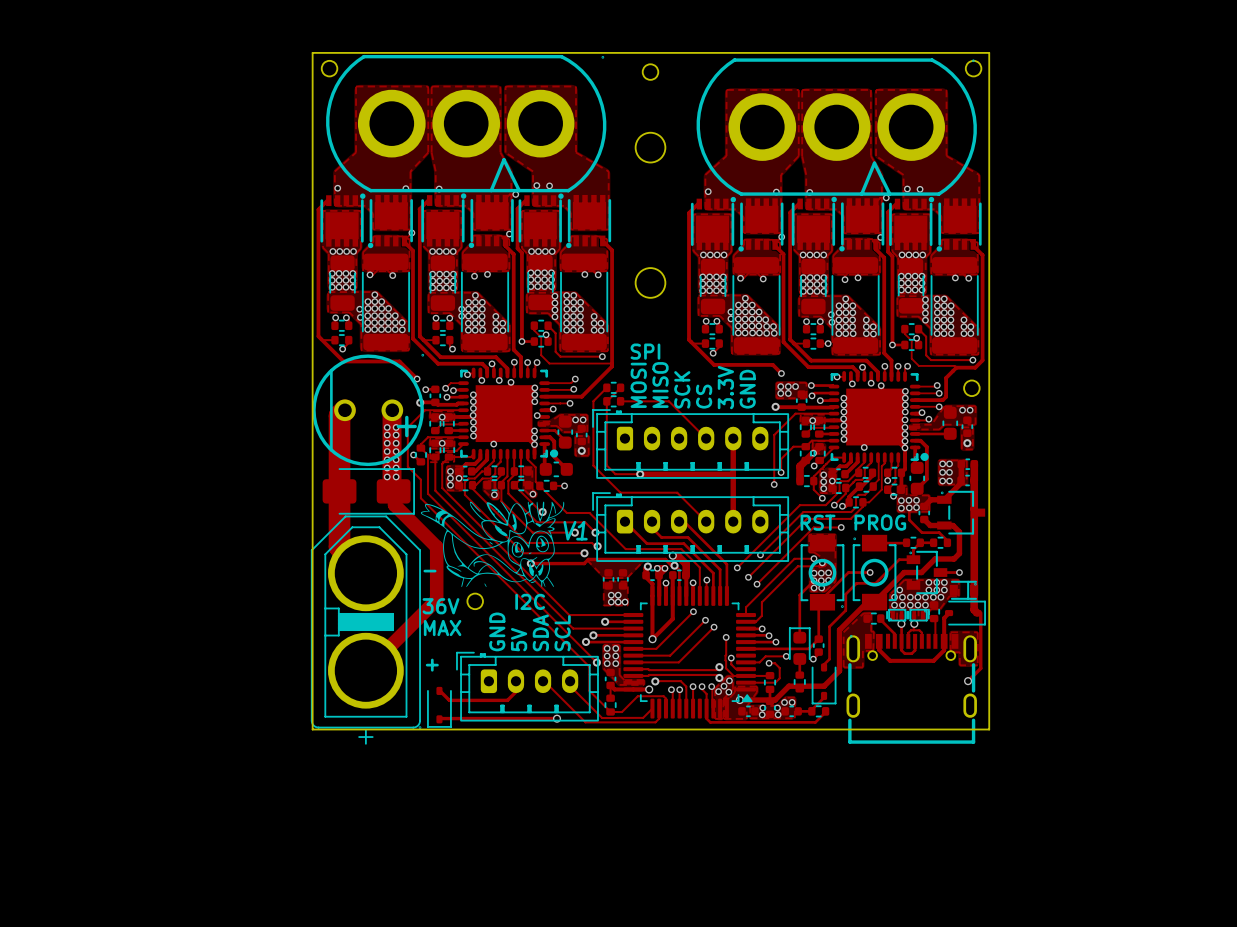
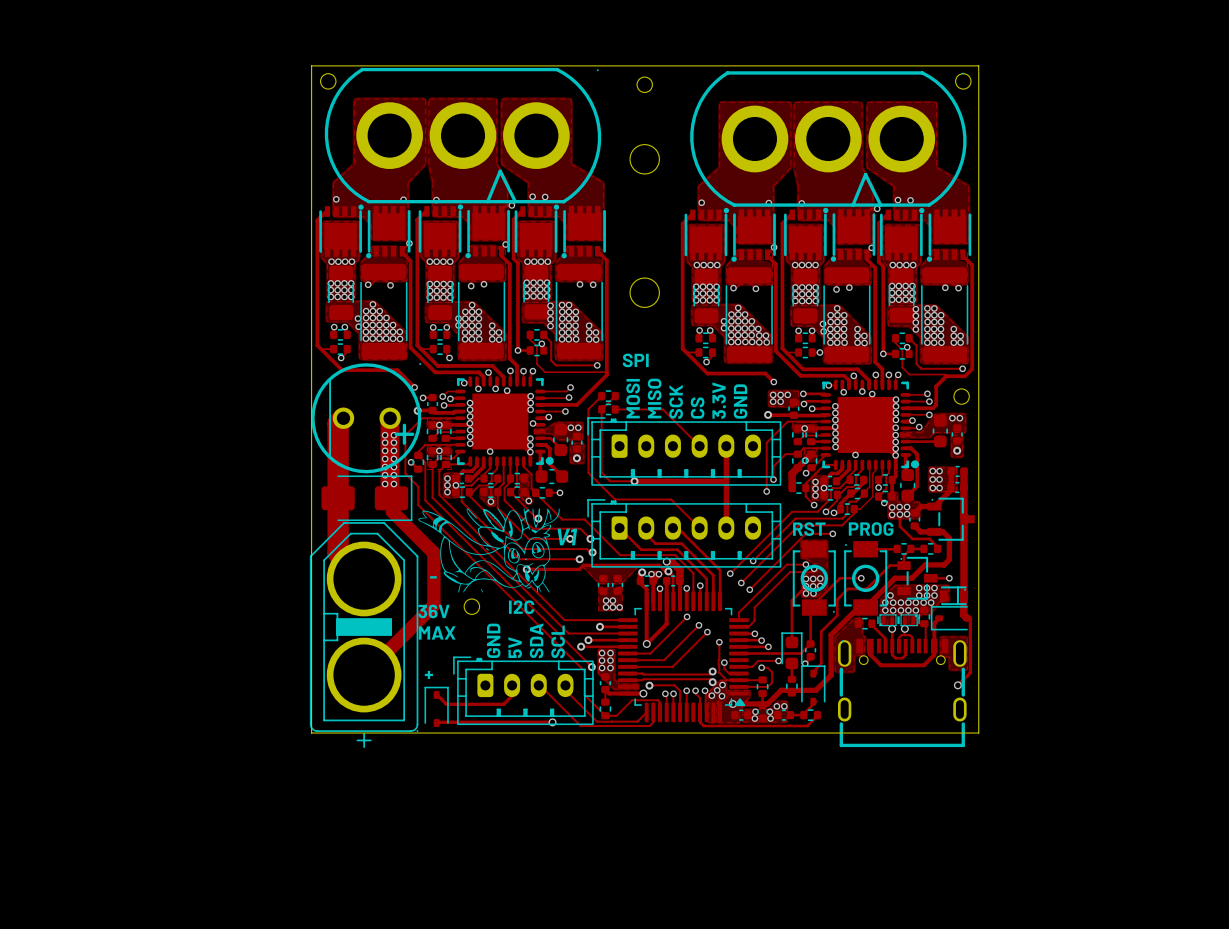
part rotation: 0° (965, 613) -> 180° (950, 618)
part rotation: 0° (824, 683) -> 180° (813, 685)
part rotation: 0° (439, 707) -> 180° (436, 706)

